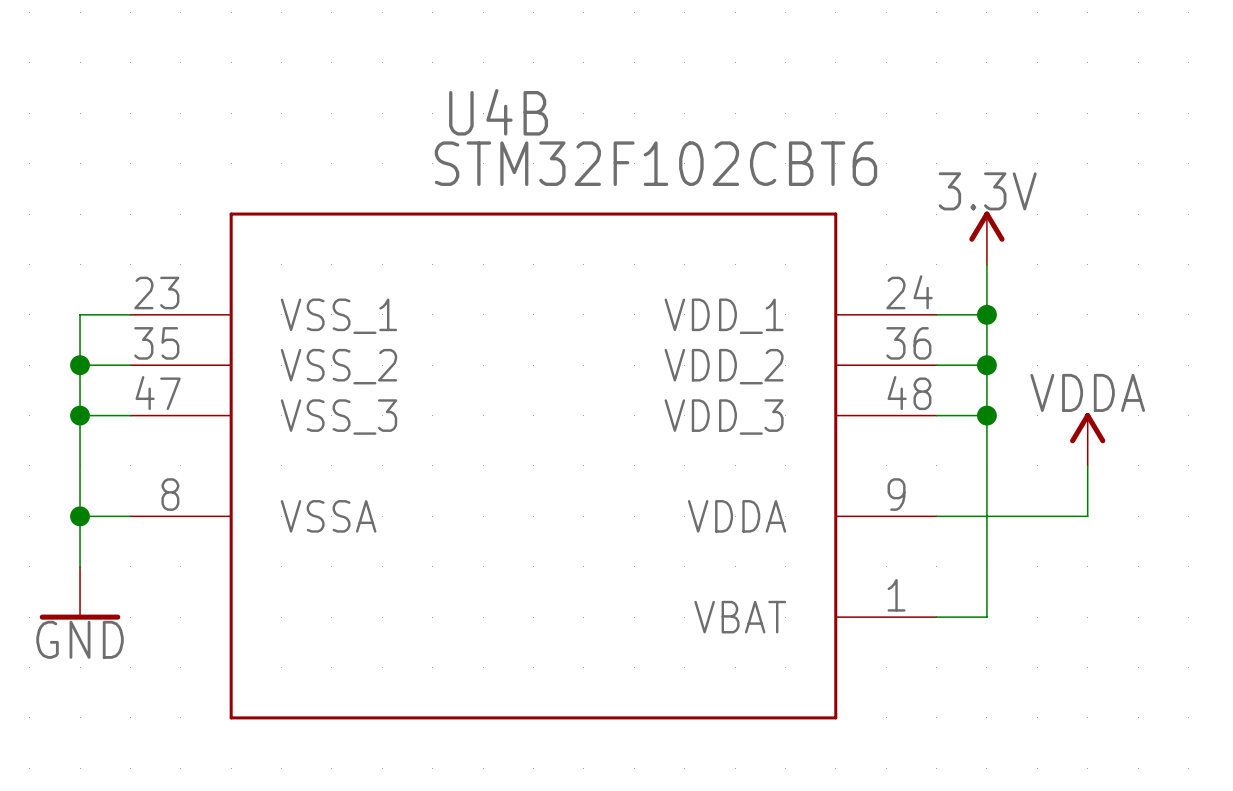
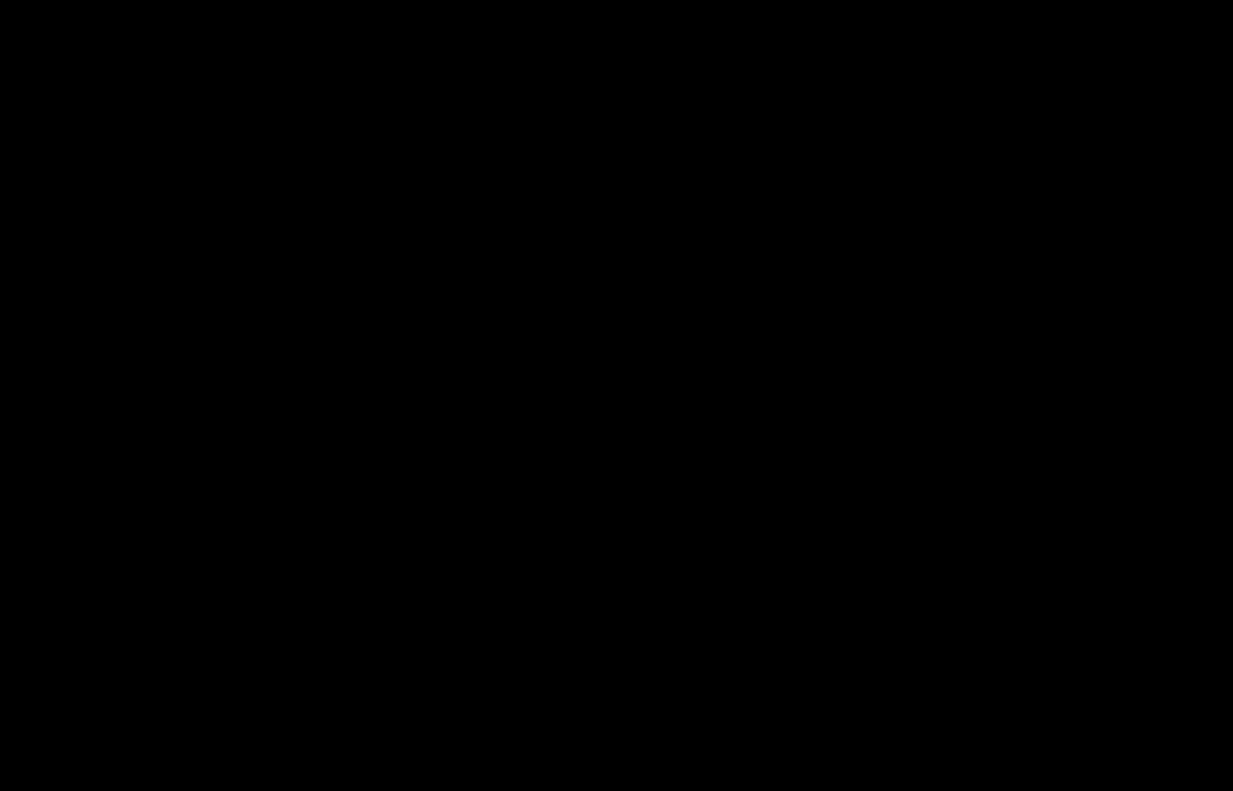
power symbol: 3.3V (986, 237) -> none
wire: (986, 264) (986, 617) (936, 617) -> none
wire: (130, 314) (80, 314) (80, 566) -> none
wire: (936, 314) (986, 314) -> none
junction: (986, 314) -> none
wire: (80, 365) (130, 365) -> none
junction: (80, 365) -> none
wire: (936, 365) (986, 365) -> none
junction: (986, 365) -> none
wire: (80, 415) (130, 415) -> none
junction: (80, 415) -> none
wire: (936, 415) (986, 415) -> none
junction: (986, 415) -> none
power symbol: VDDA (1087, 439) -> none
U4B: STM32F102CBT6 (533, 465) -> none
wire: (1087, 465) (1087, 516) (936, 516) -> none
wire: (80, 516) (130, 516) -> none
junction: (80, 516) -> none
power symbol: GND (80, 593) -> none

